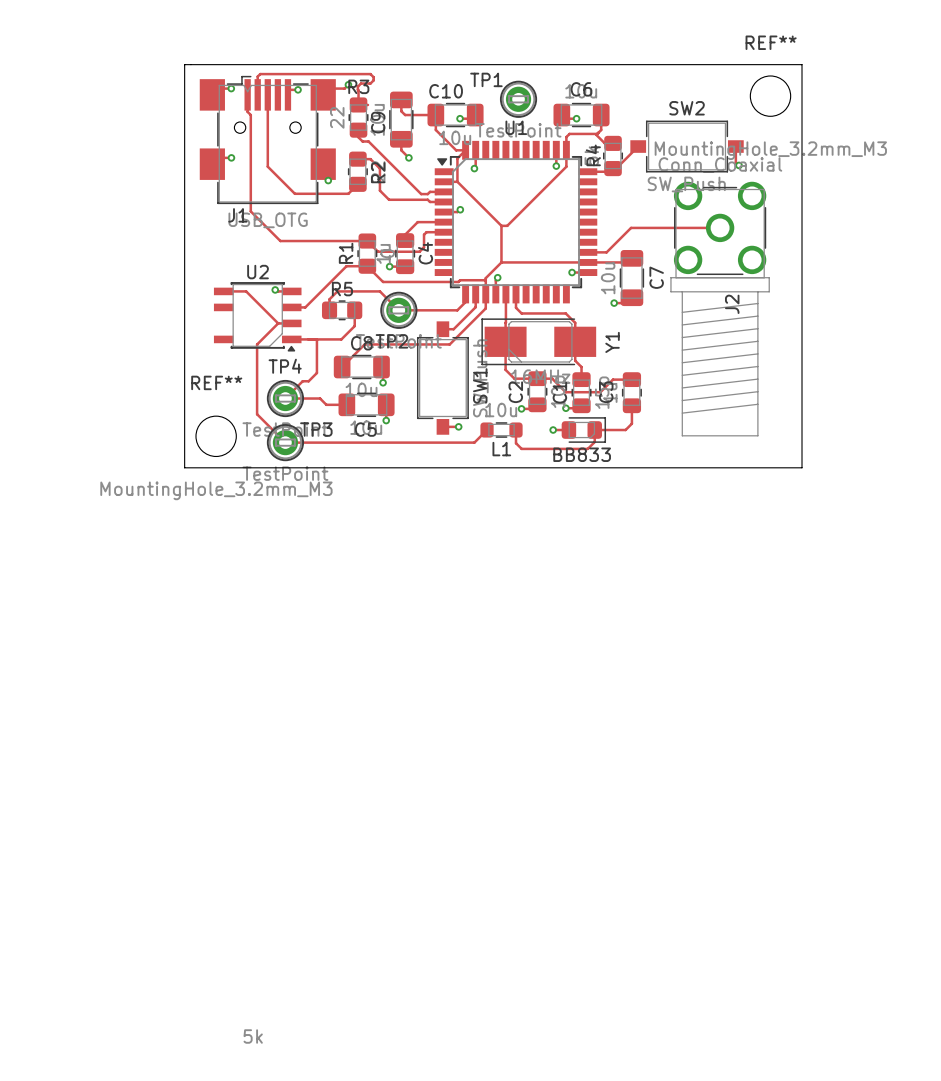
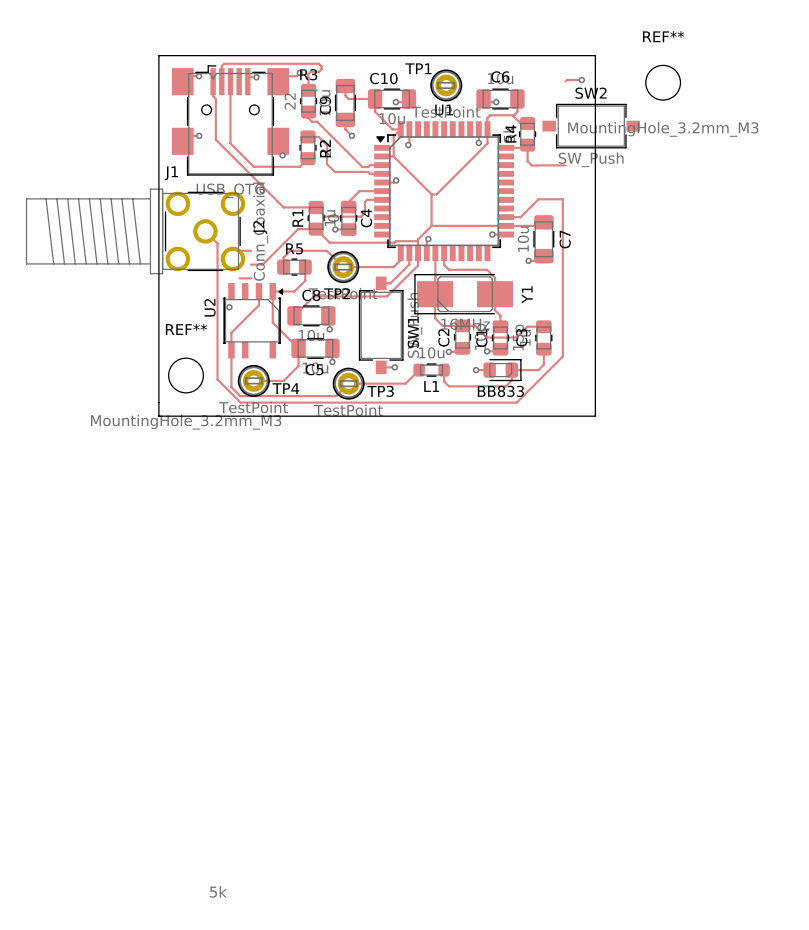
board edge: (691, 64) (802, 64) (802, 467) (184, 467) -> (595, 55) (595, 416) (158, 416) (158, 402)
track: none -> (581, 80) (565, 81)
via: none -> (581, 80)
track: (638, 146) (616, 168) -> none
track: (735, 146) (735, 162) (739, 165) -> none
track: (250, 162) (250, 211) (280, 241) (329, 241) -> (215, 139) (283, 207)
via: (739, 165) -> none
track: none -> (527, 145) (527, 161) (531, 165) (565, 165)
J1 name position: J1 (237, 215) -> J1 (171, 173)
track: (720, 227) (631, 227) (604, 252) -> (205, 231) (217, 243) (217, 379) (240, 402) (516, 402) (562, 356) (562, 199) (538, 199) (520, 217)
via position: (275, 289) -> (229, 307)
track: (223, 291) (246, 291) (278, 323) (257, 344) (257, 414) (285, 442) (294, 442) -> none
J2 name position: J2 (732, 304) -> J2 (260, 227)
J2 rotation: 0° (720, 309) -> 90° clockwise (135, 231)
J2 position: (720, 309) -> (135, 231)
U2 rotation: 0° (257, 316) -> 90° counterclockwise (253, 320)
U2 position: (257, 316) -> (253, 320)
track: (342, 338) (291, 339) -> (294, 291) (272, 292)
TP4 name position: TP4 (285, 366) -> TP4 (285, 388)
track: (316, 373) (308, 381) (302, 381) (285, 398) (320, 398) (326, 404) (346, 404) -> (272, 321) (302, 352)
TP4 position: (285, 398) -> (253, 380)
track: none -> (298, 348) (298, 366) (283, 380)
TP3 name position: TP3 (316, 429) -> TP3 (380, 391)
TP3 position: (285, 442) -> (348, 383)
track: (329, 442) (474, 442) -> (259, 291) (259, 305) (231, 332) (231, 387) (240, 396) (336, 396) (348, 383) (405, 383) (408, 380)

